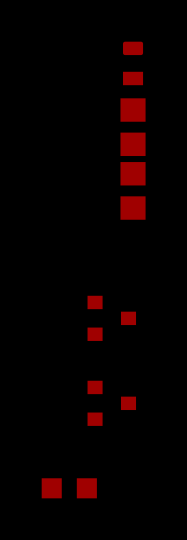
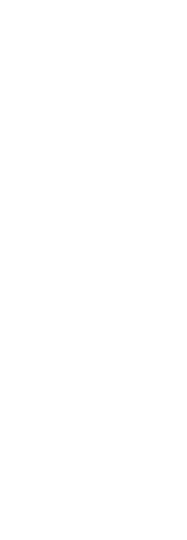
part: (133, 63) -> none
part: (133, 127) -> none
part: (133, 190) -> none
part: (111, 318) -> none
part: (111, 403) -> none
part: (69, 488) -> none

